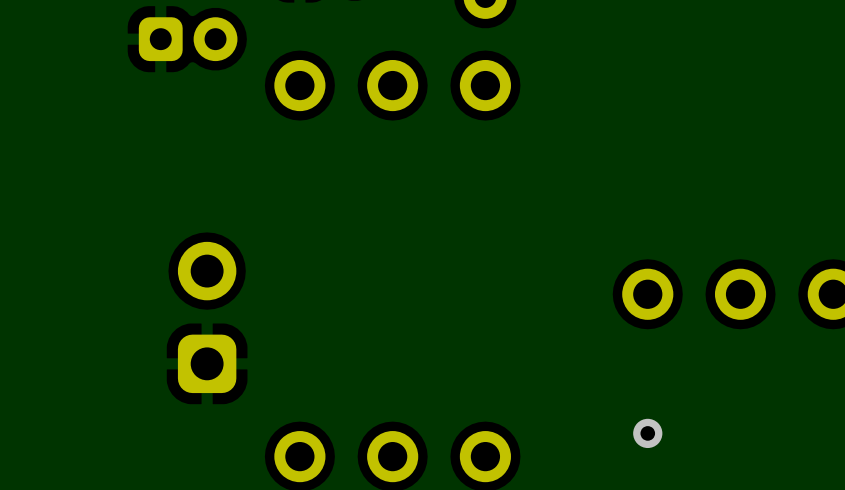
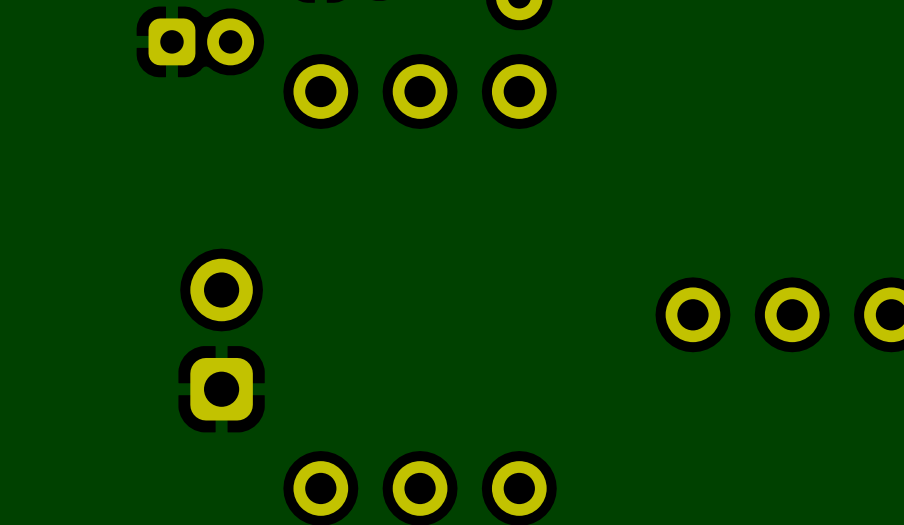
via: (647, 433) -> none

